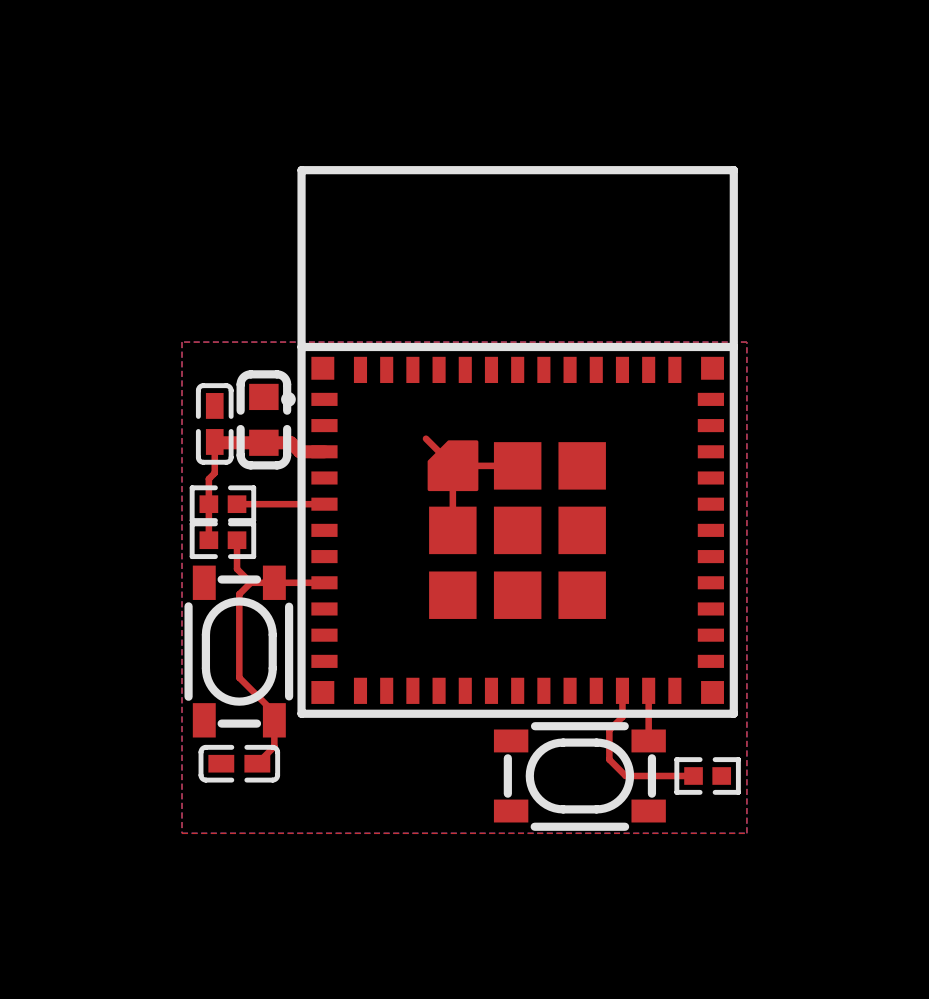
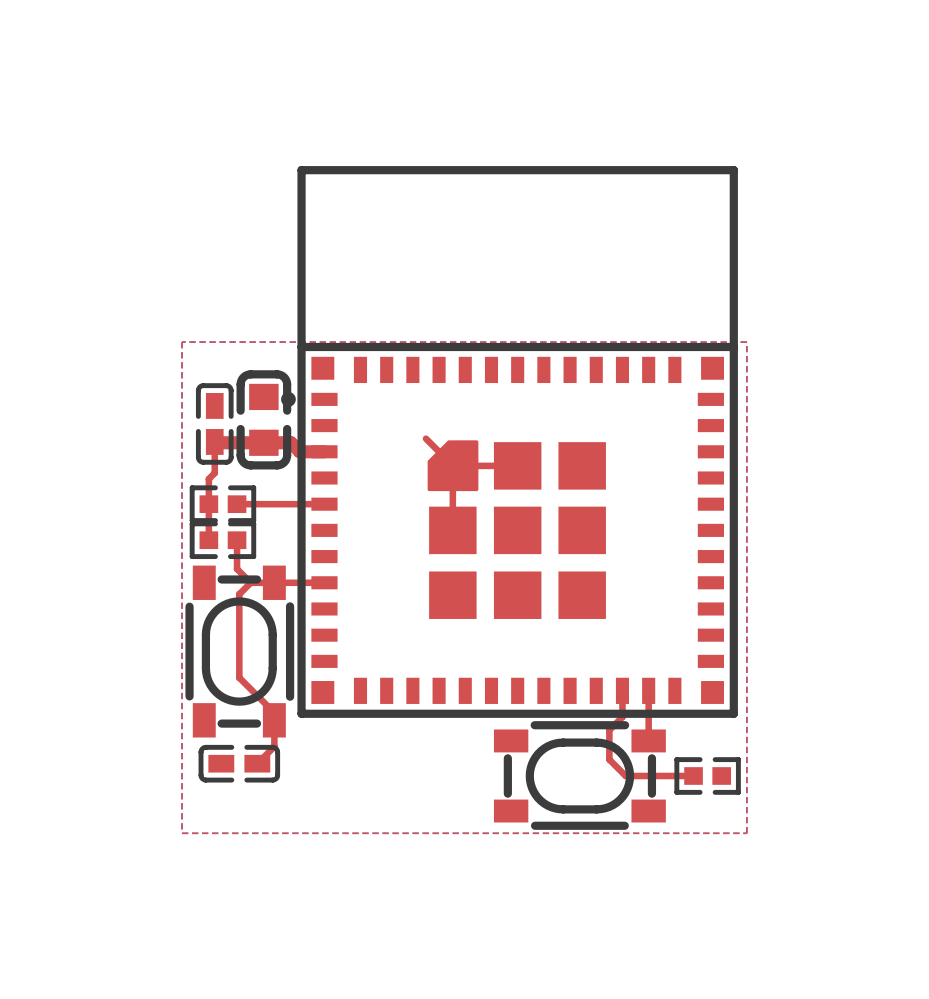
part rotation: 0° (238, 651) -> 180° (239, 651)
part rotation: 0° (579, 776) -> 180° (579, 775)

